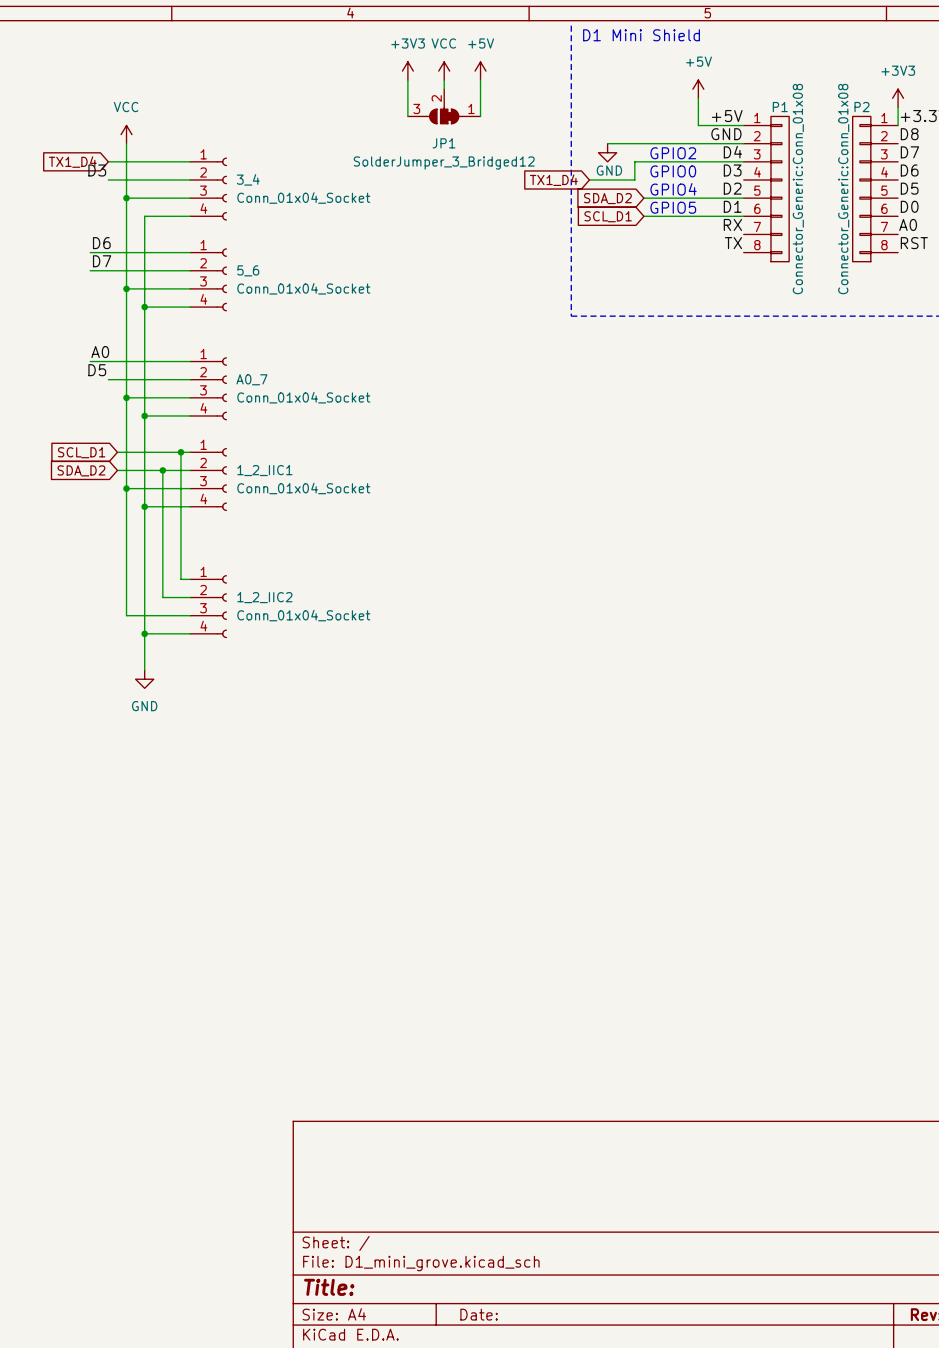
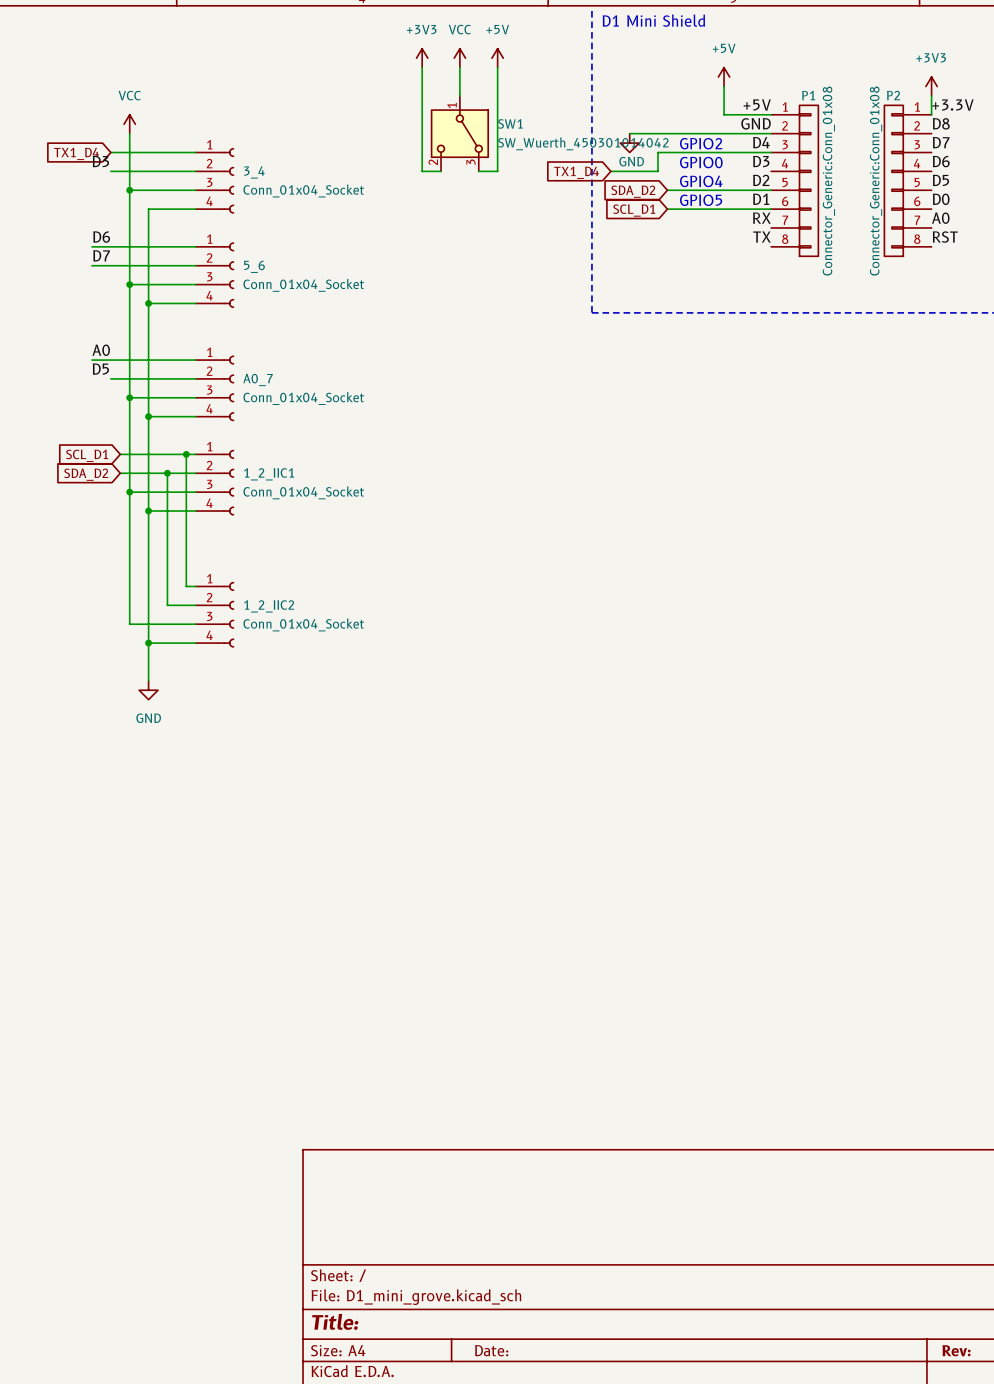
JP1: SolderJumper_3_Bridged12 (444, 106) -> none
wire: none -> (422, 105) (422, 171) (441, 171)
wire: none -> (497, 105) (497, 171) (478, 171)
SW1: none -> SW_Wuerth_450301014042 (459, 133)

